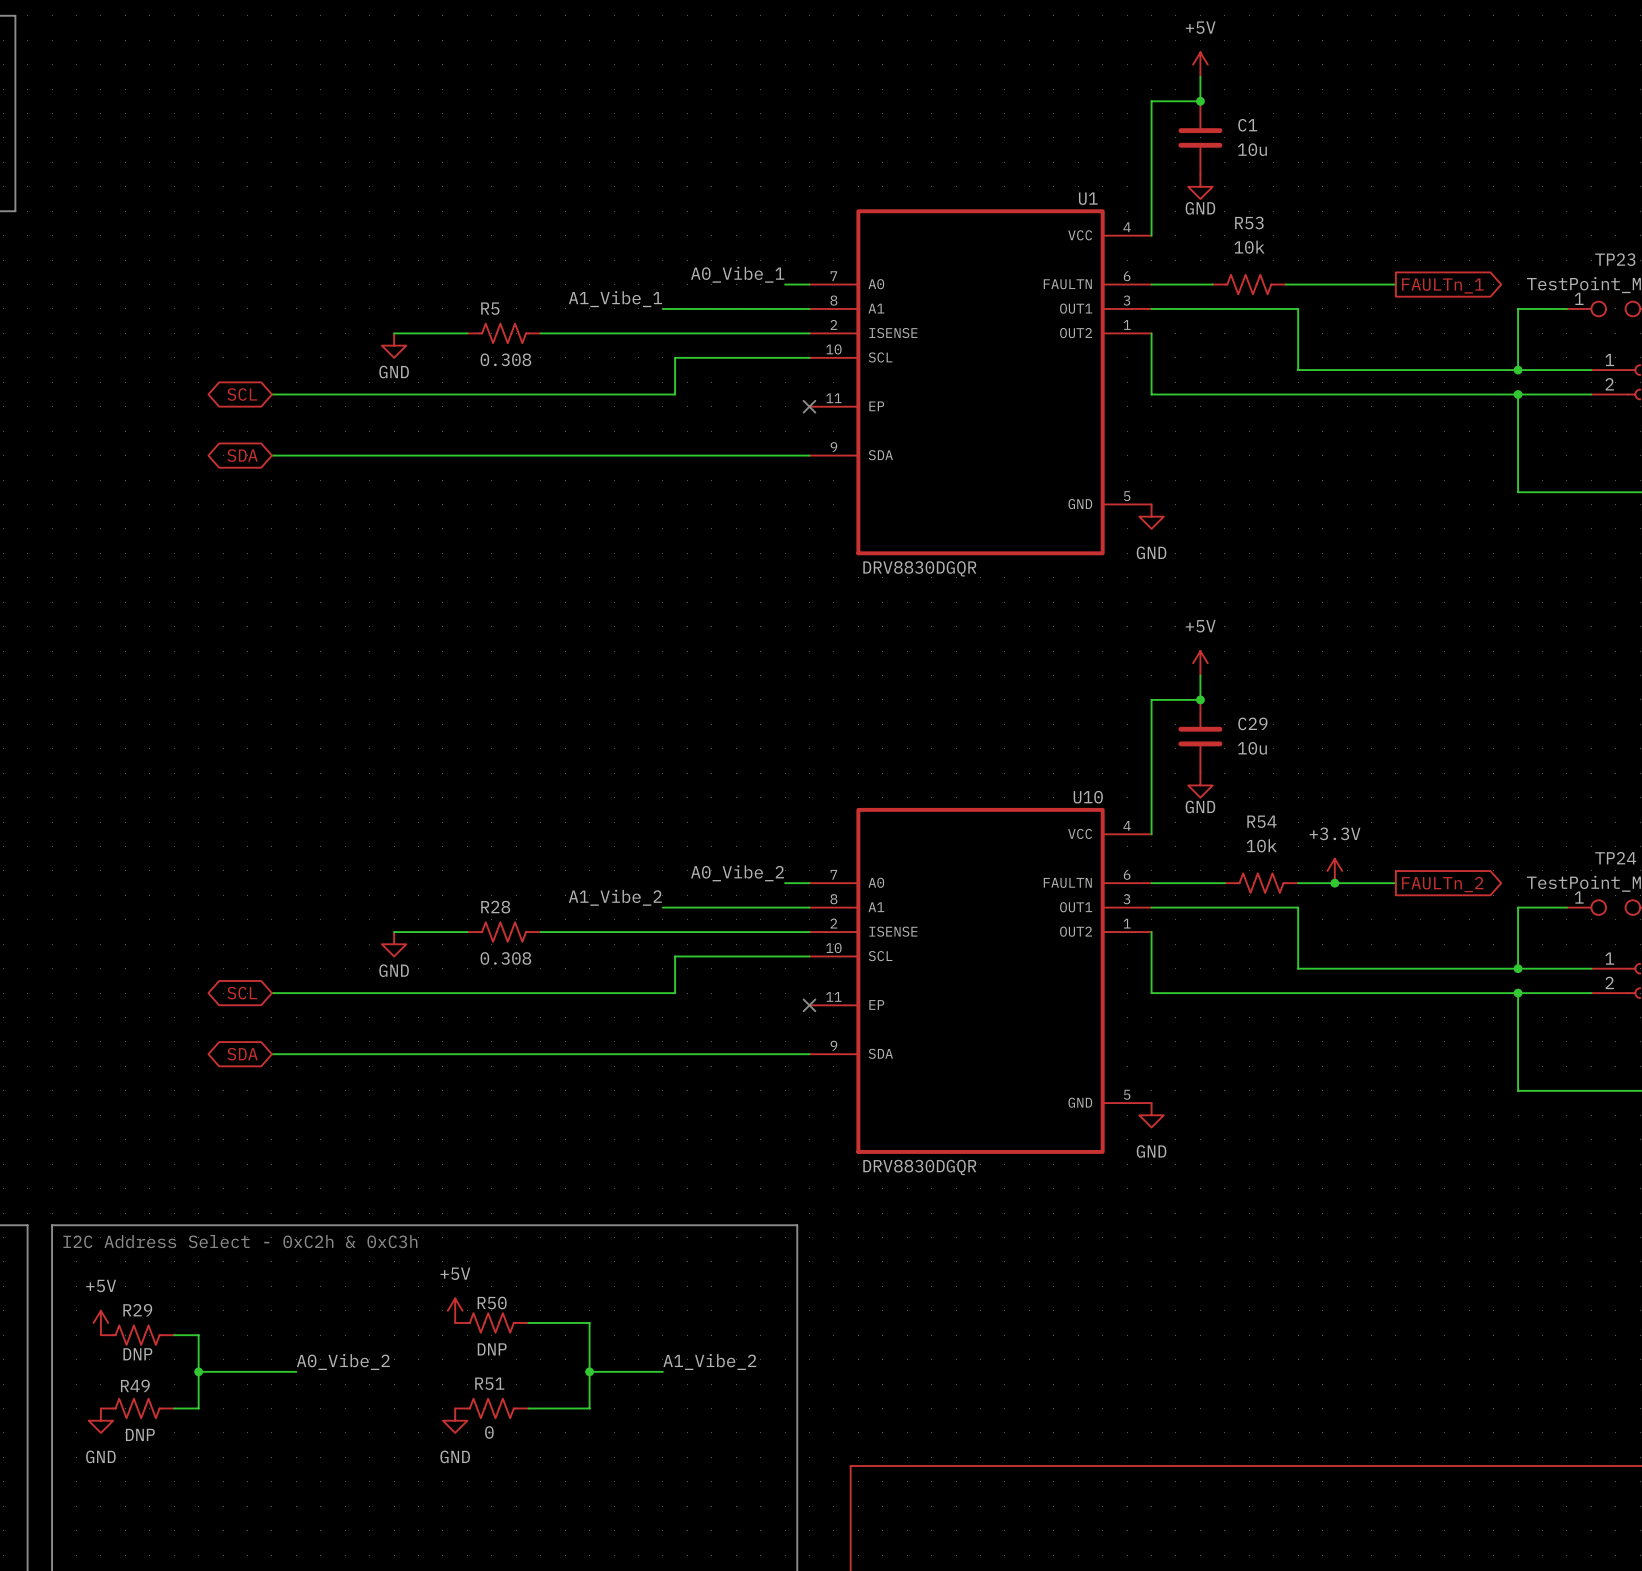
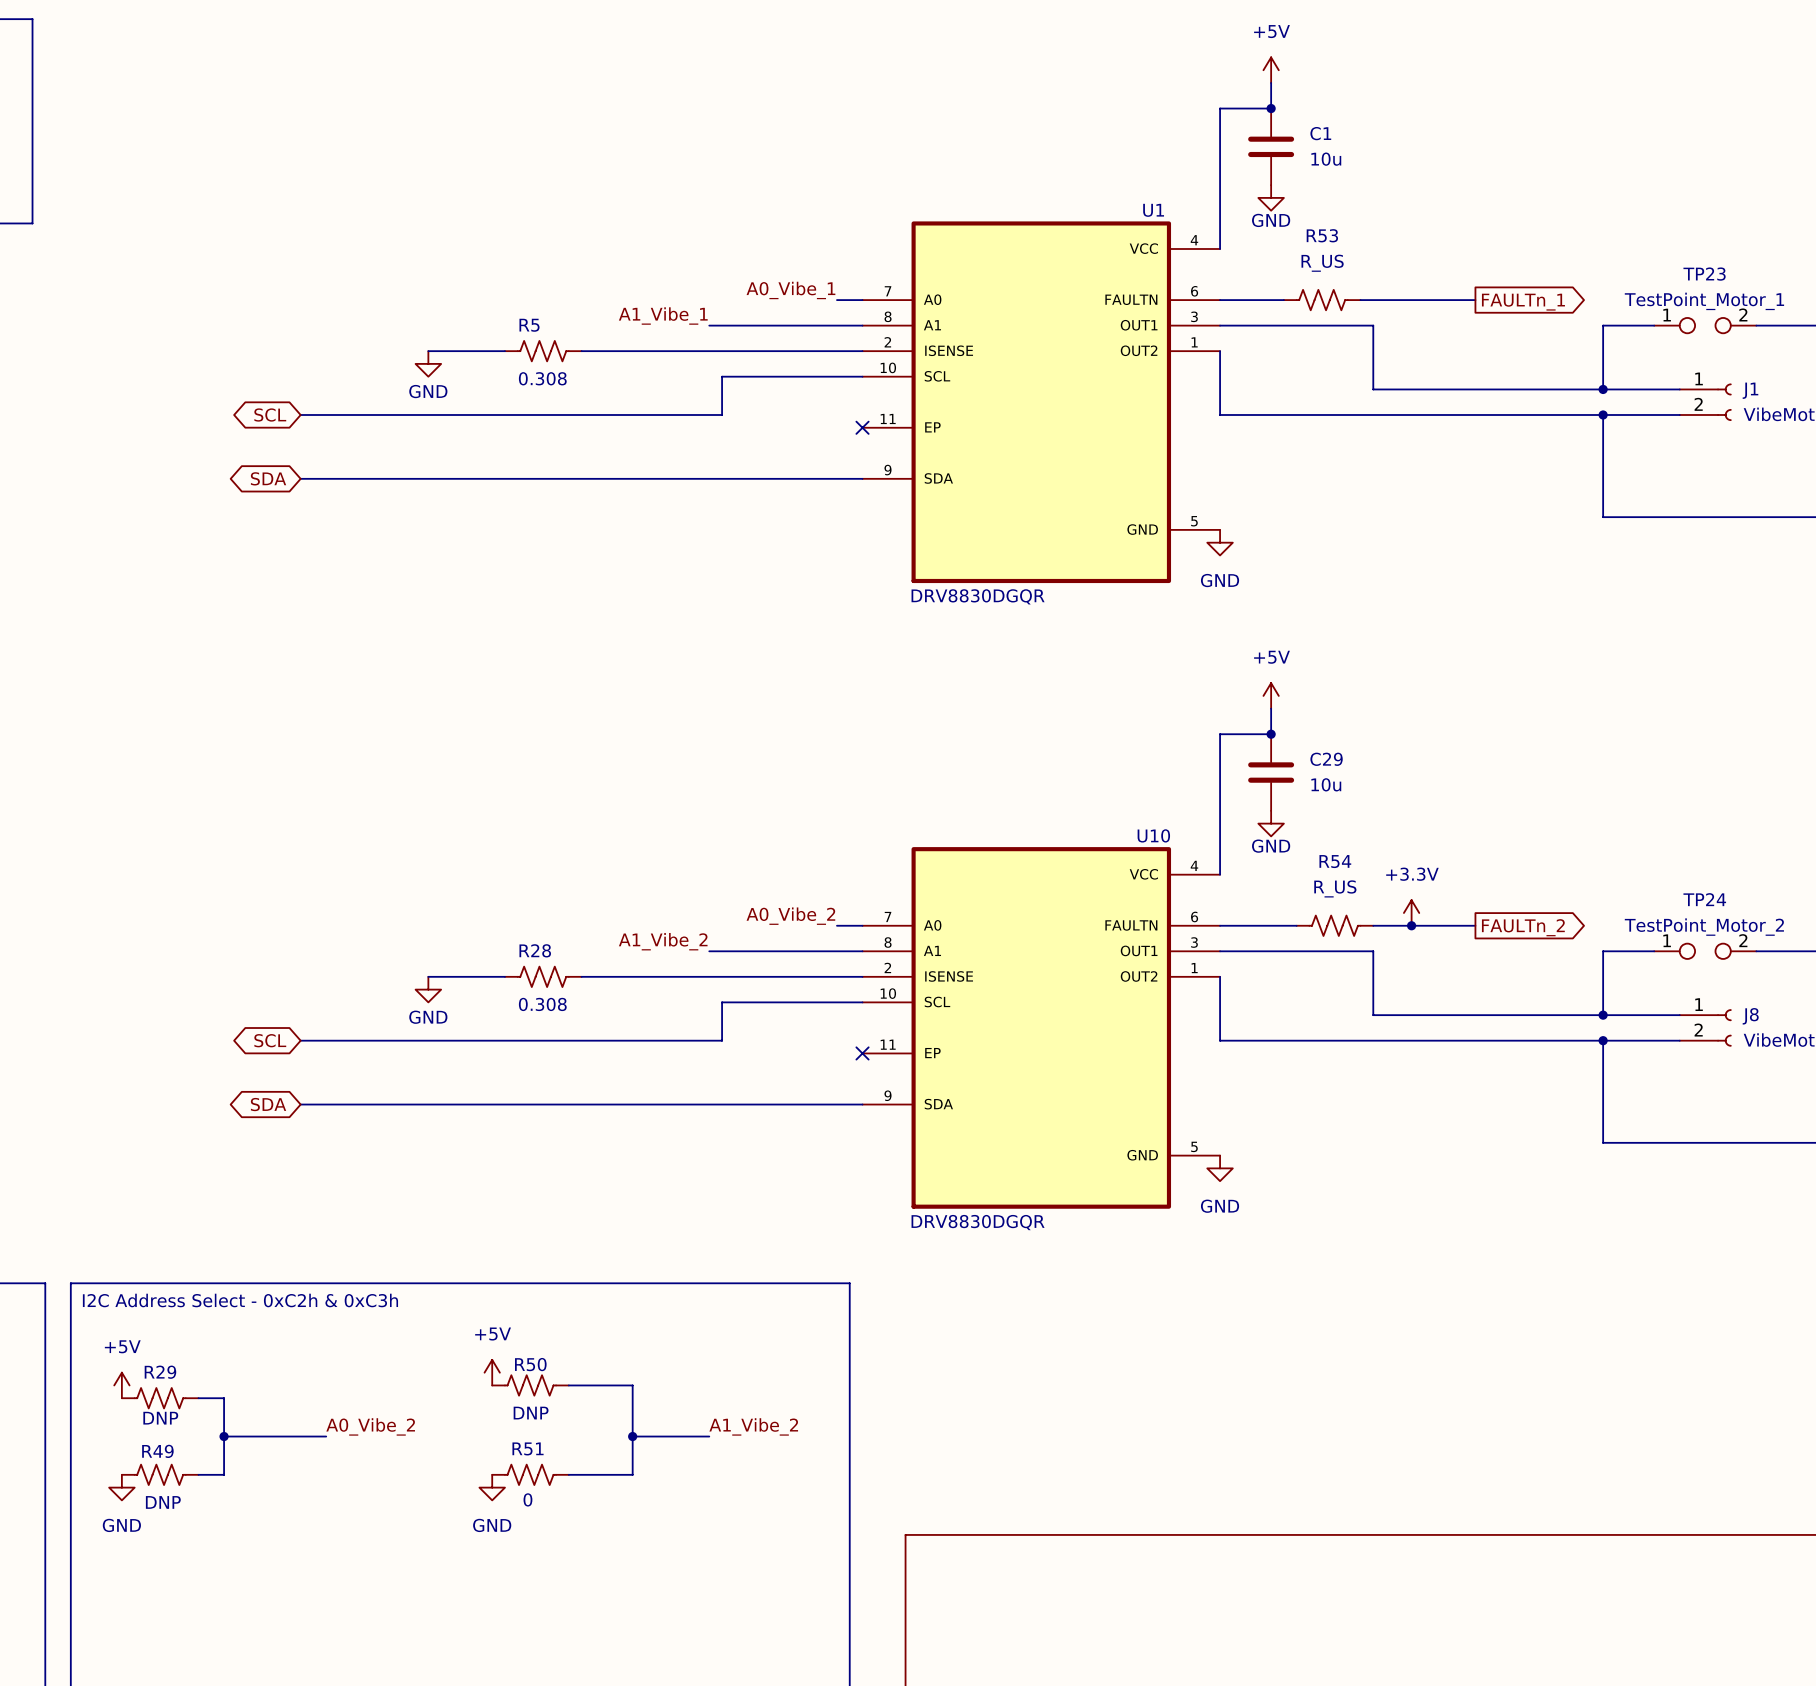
R53 value: 10k (1249, 247) -> R_US (1322, 263)
R54 value: 10k (1261, 845) -> R_US (1335, 888)

